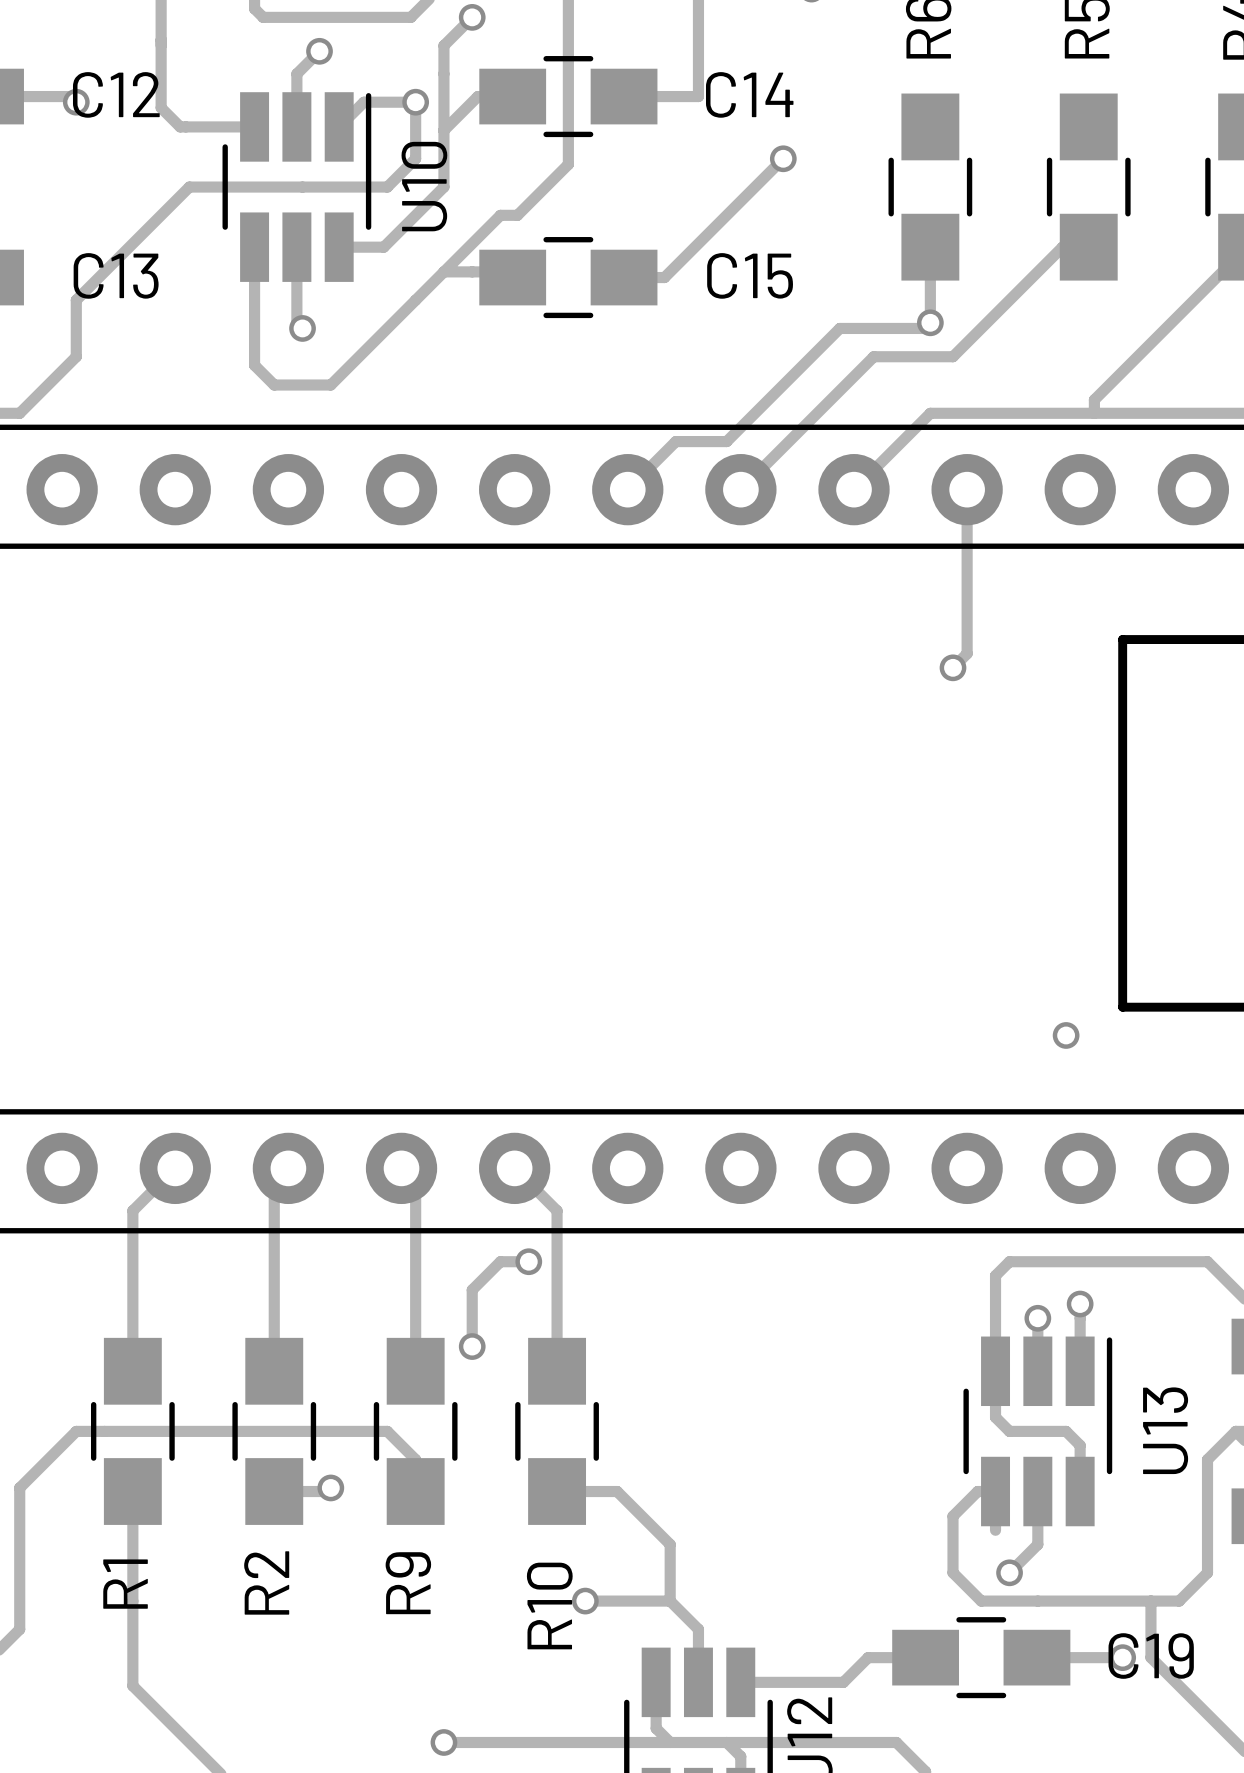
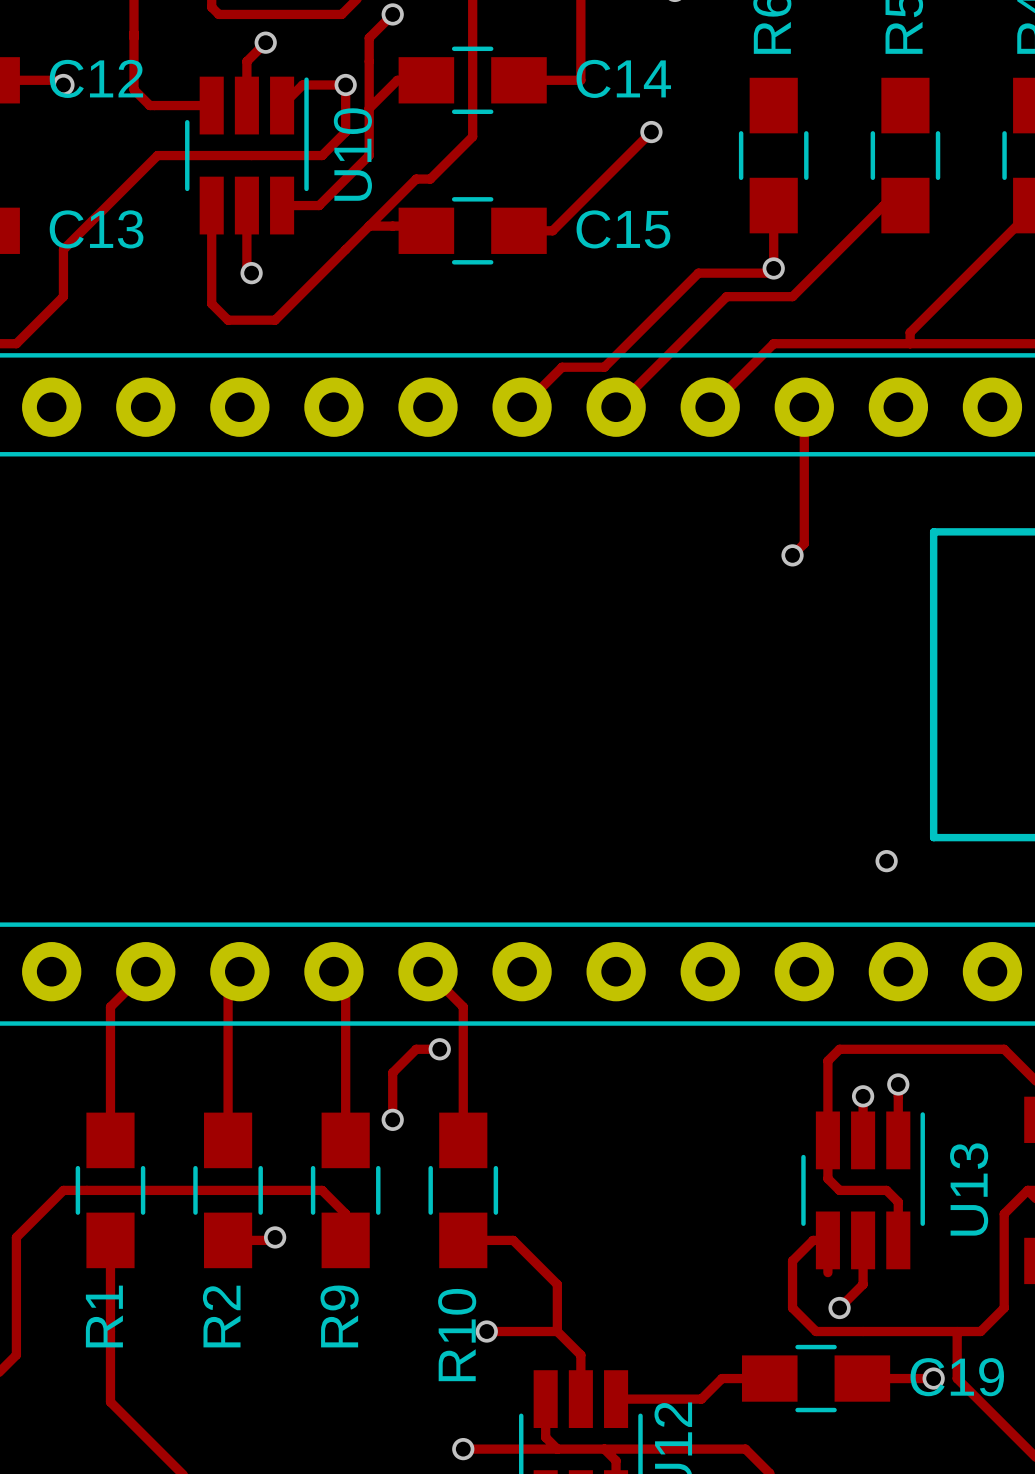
track: (443, 1742) (557, 1742) -> none
via: (443, 1742) -> none
via: none -> (463, 1449)

